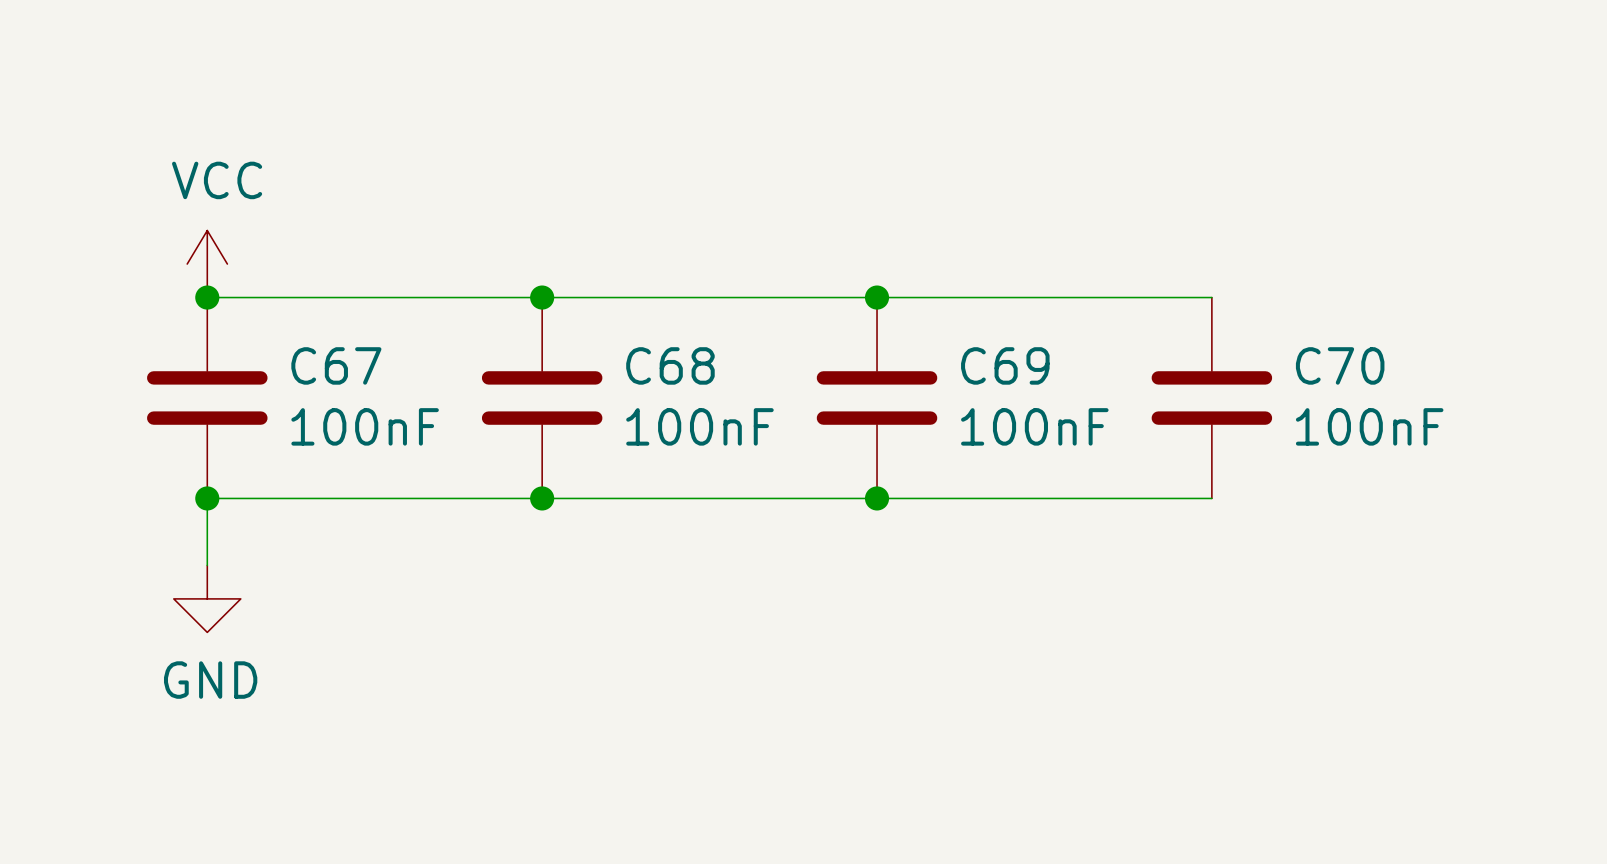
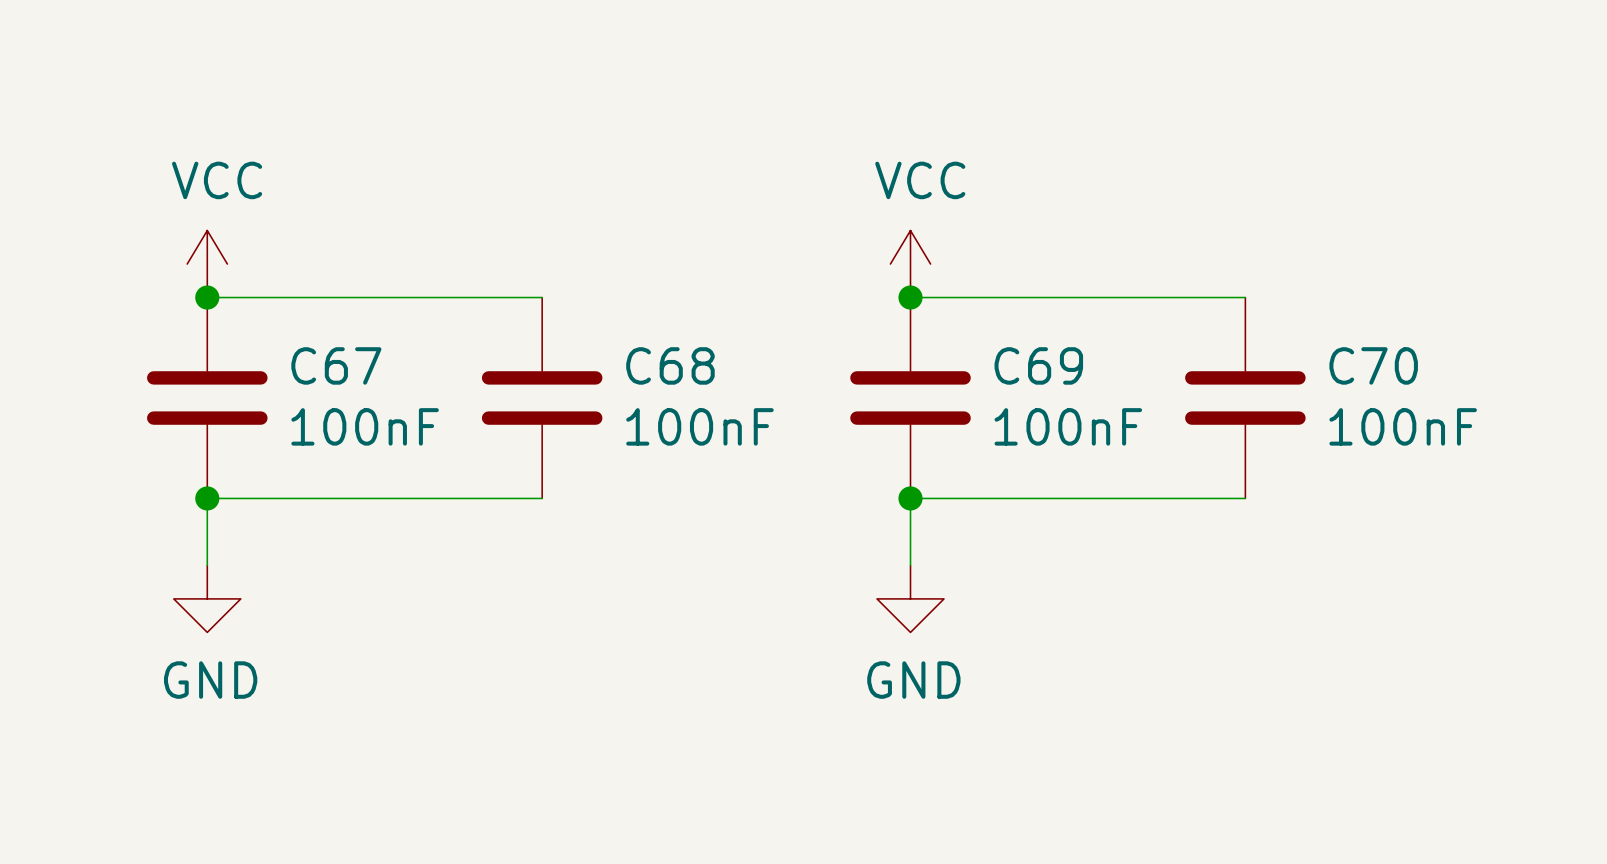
power symbol: none -> VCC (910, 264)
wire: (542, 297) (910, 297) -> none
junction: (542, 297) -> none
junction position: (877, 297) -> (910, 297)
wire: none -> (1211, 297) (1245, 297)
C69 position: (877, 398) -> (910, 398)
C70 position: (1211, 398) -> (1245, 398)
wire: (542, 498) (910, 498) -> (910, 565) (910, 498)
junction: (542, 498) -> none
junction position: (877, 498) -> (910, 498)
wire: none -> (1211, 498) (1245, 498)
power symbol: none -> GND (910, 598)

